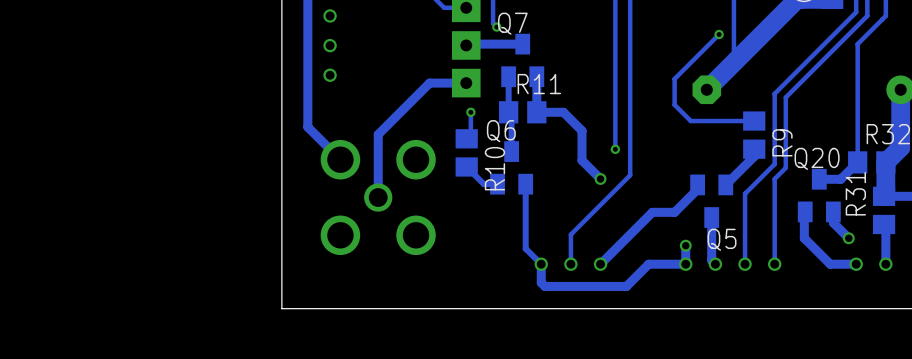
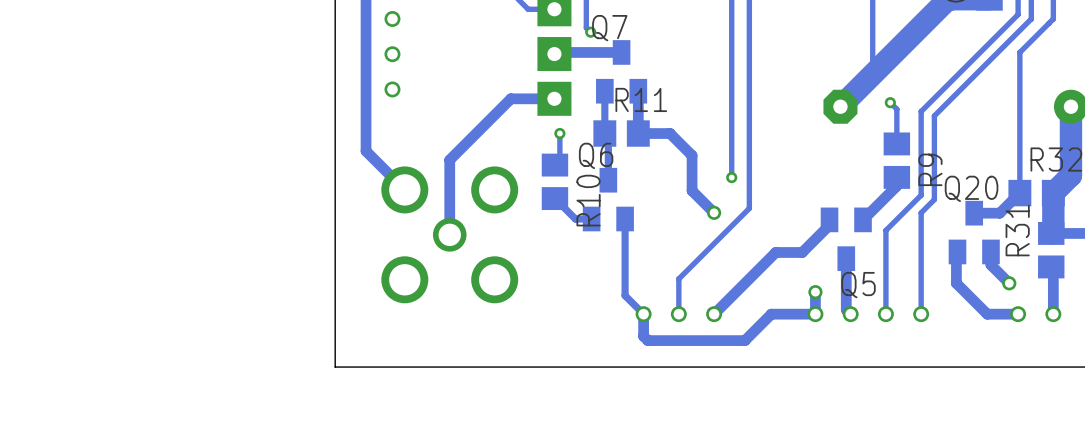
track: (719, 34) (674, 78) (674, 104) (690, 121) (754, 121) -> (890, 102) (896, 109) (896, 143)
via position: (719, 34) -> (890, 102)

